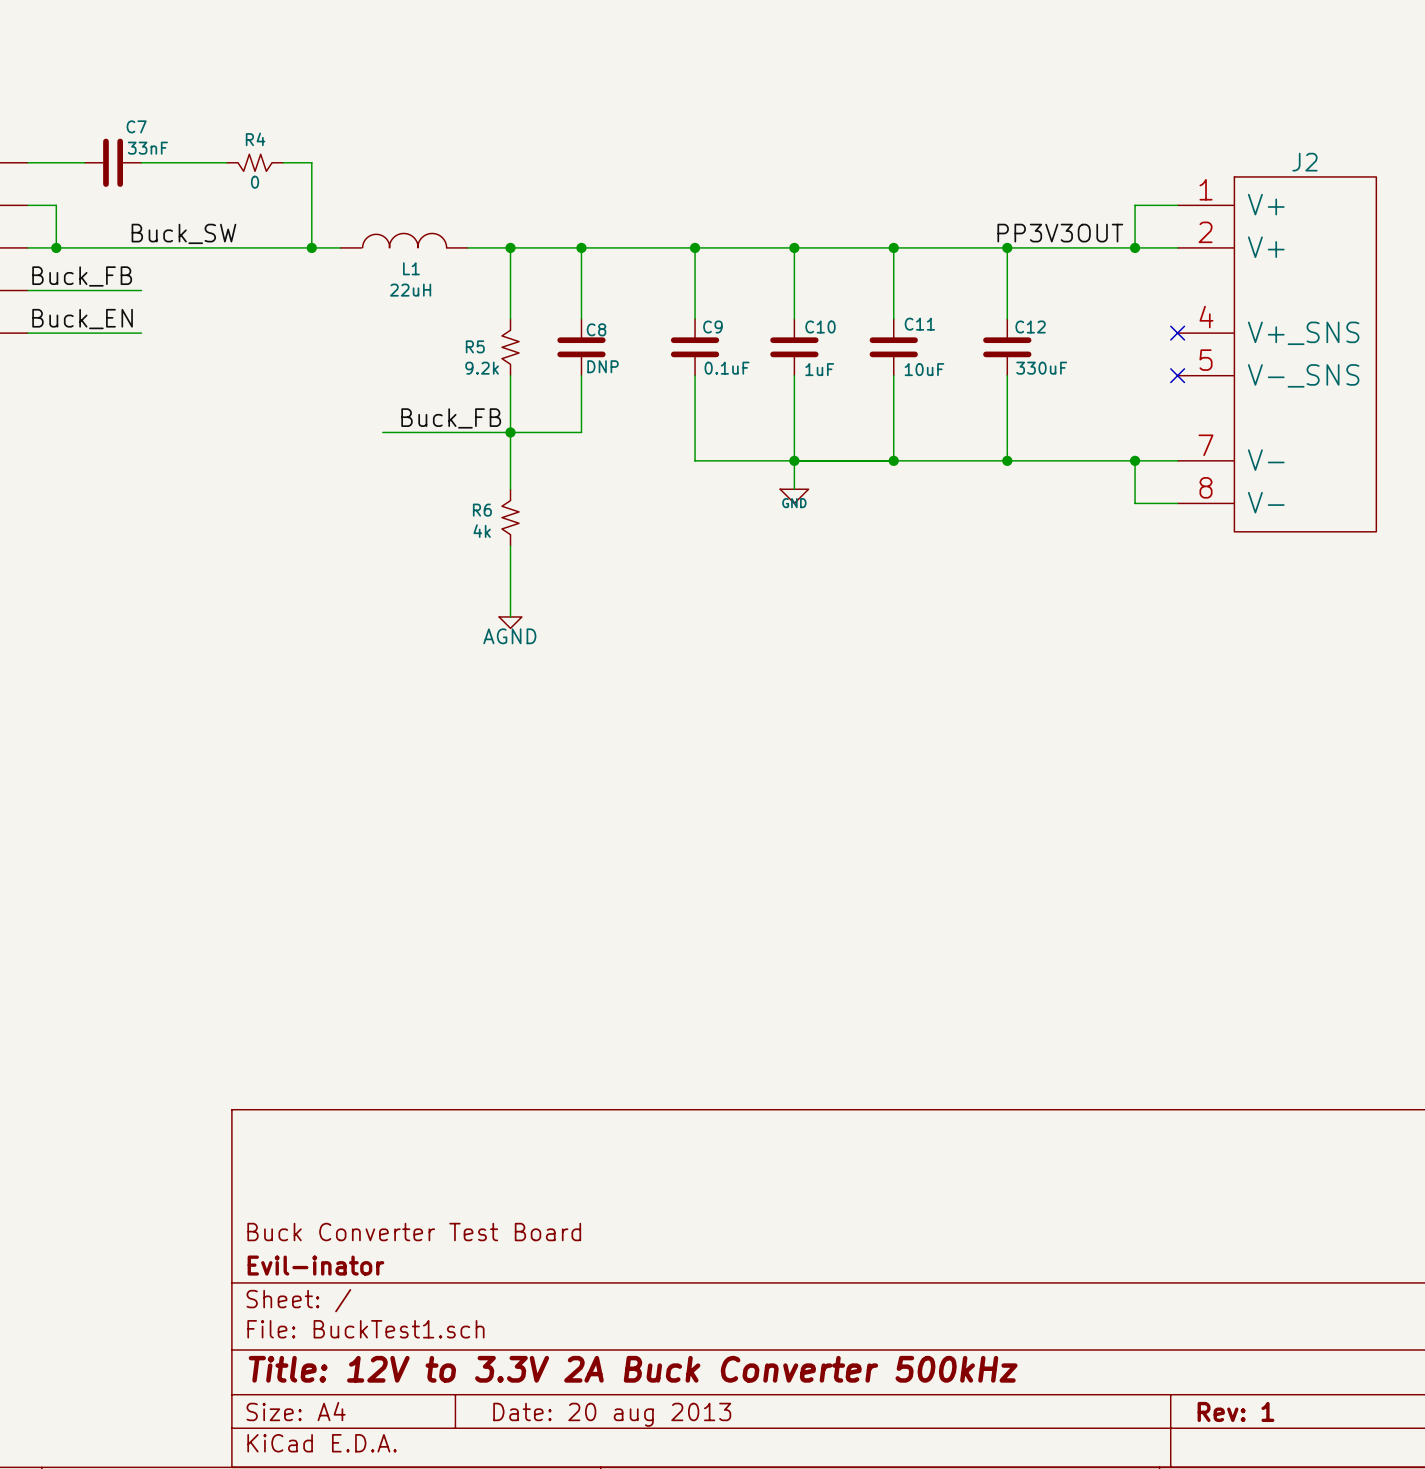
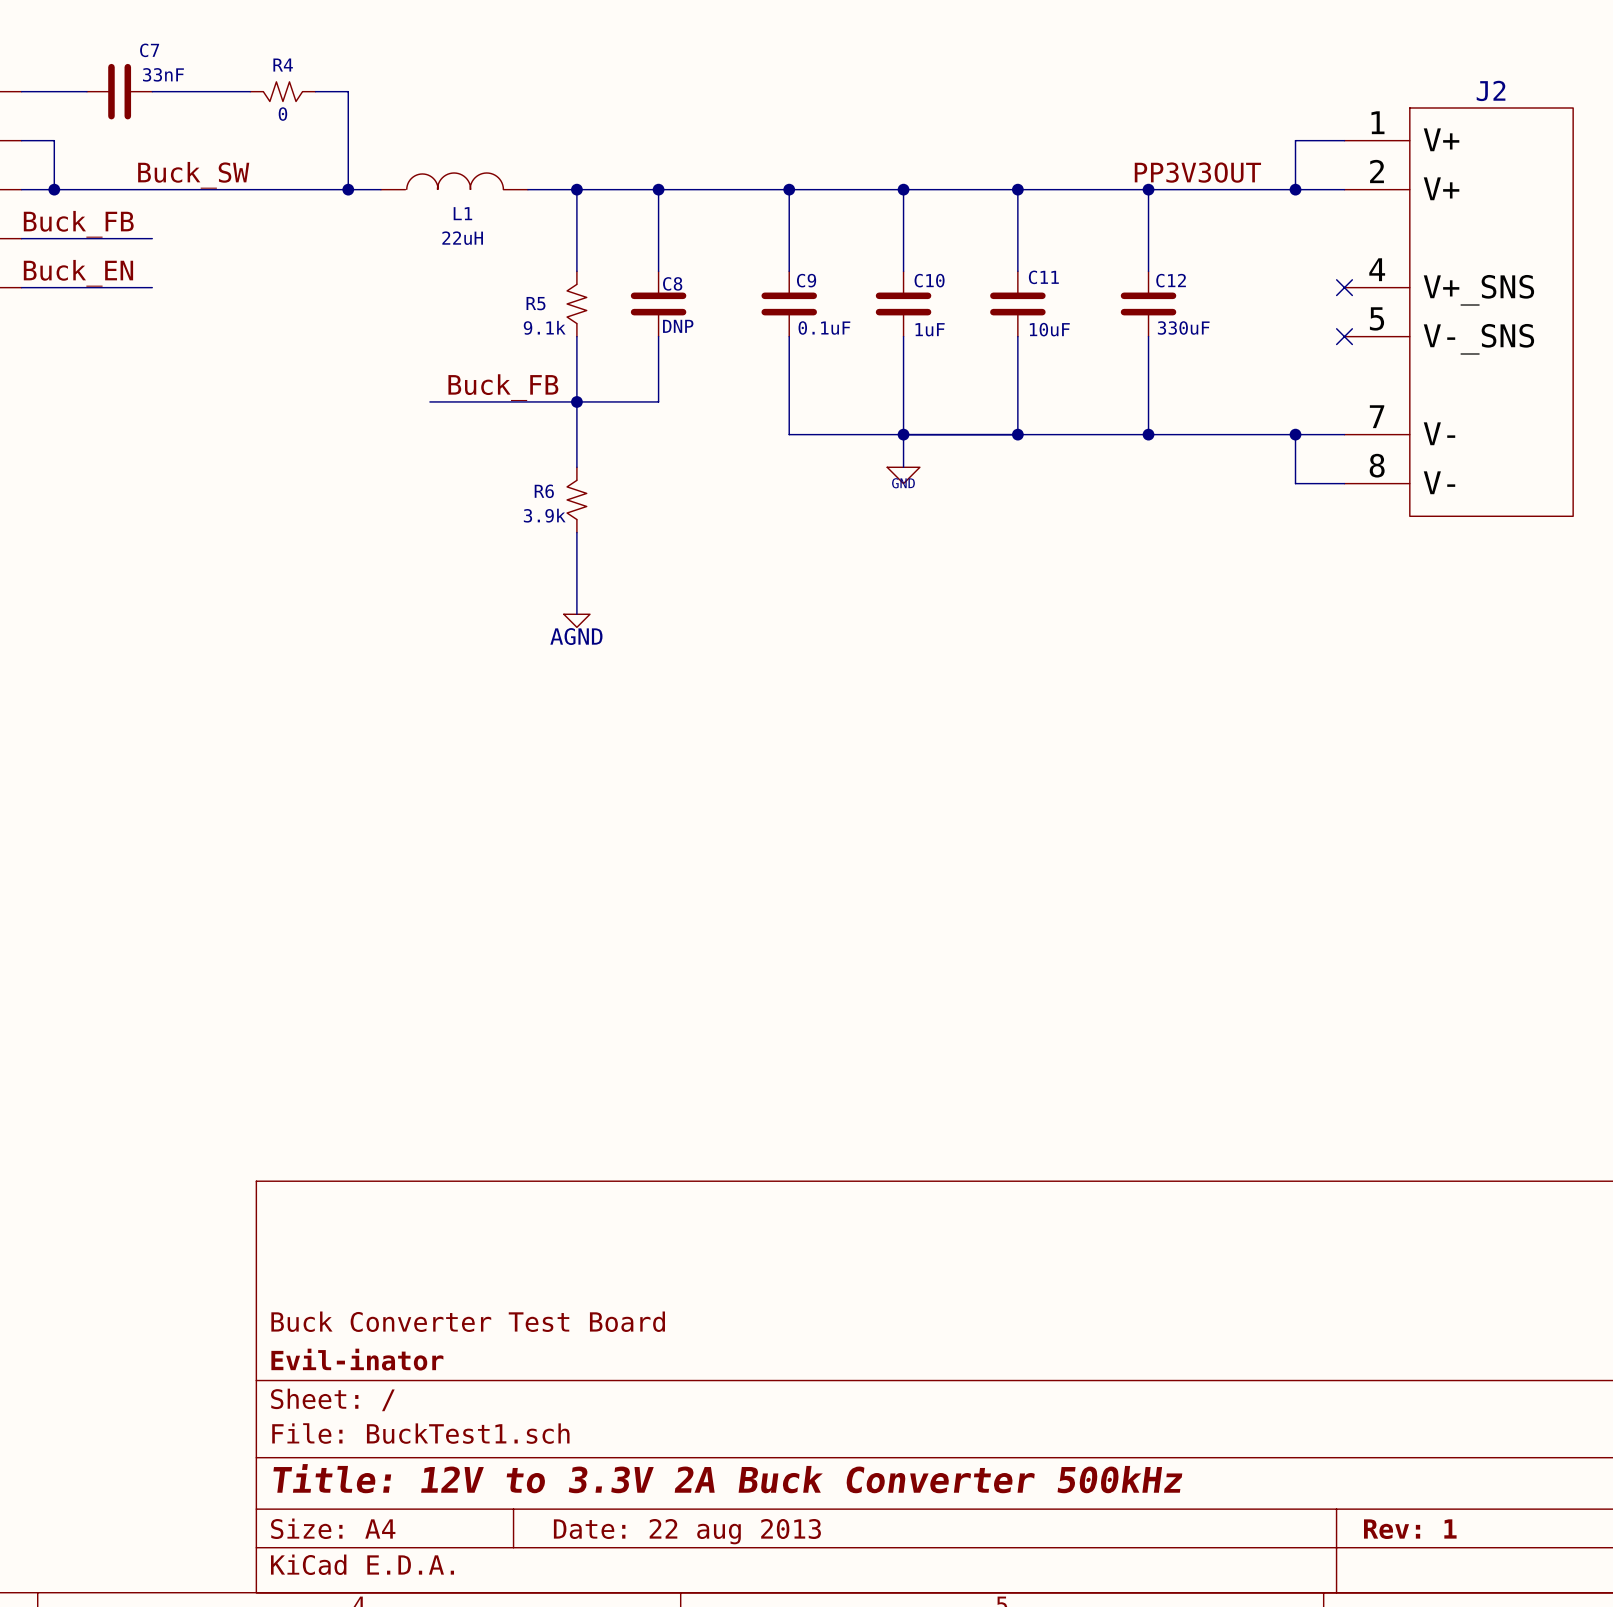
R5 value: 9.2k (482, 368) -> 9.1k (544, 327)
R6 value: 4k (482, 531) -> 3.9k (544, 515)
title block: Date: 20 aug 2013 (612, 1414) -> Date: 22 aug 2013 (687, 1531)

